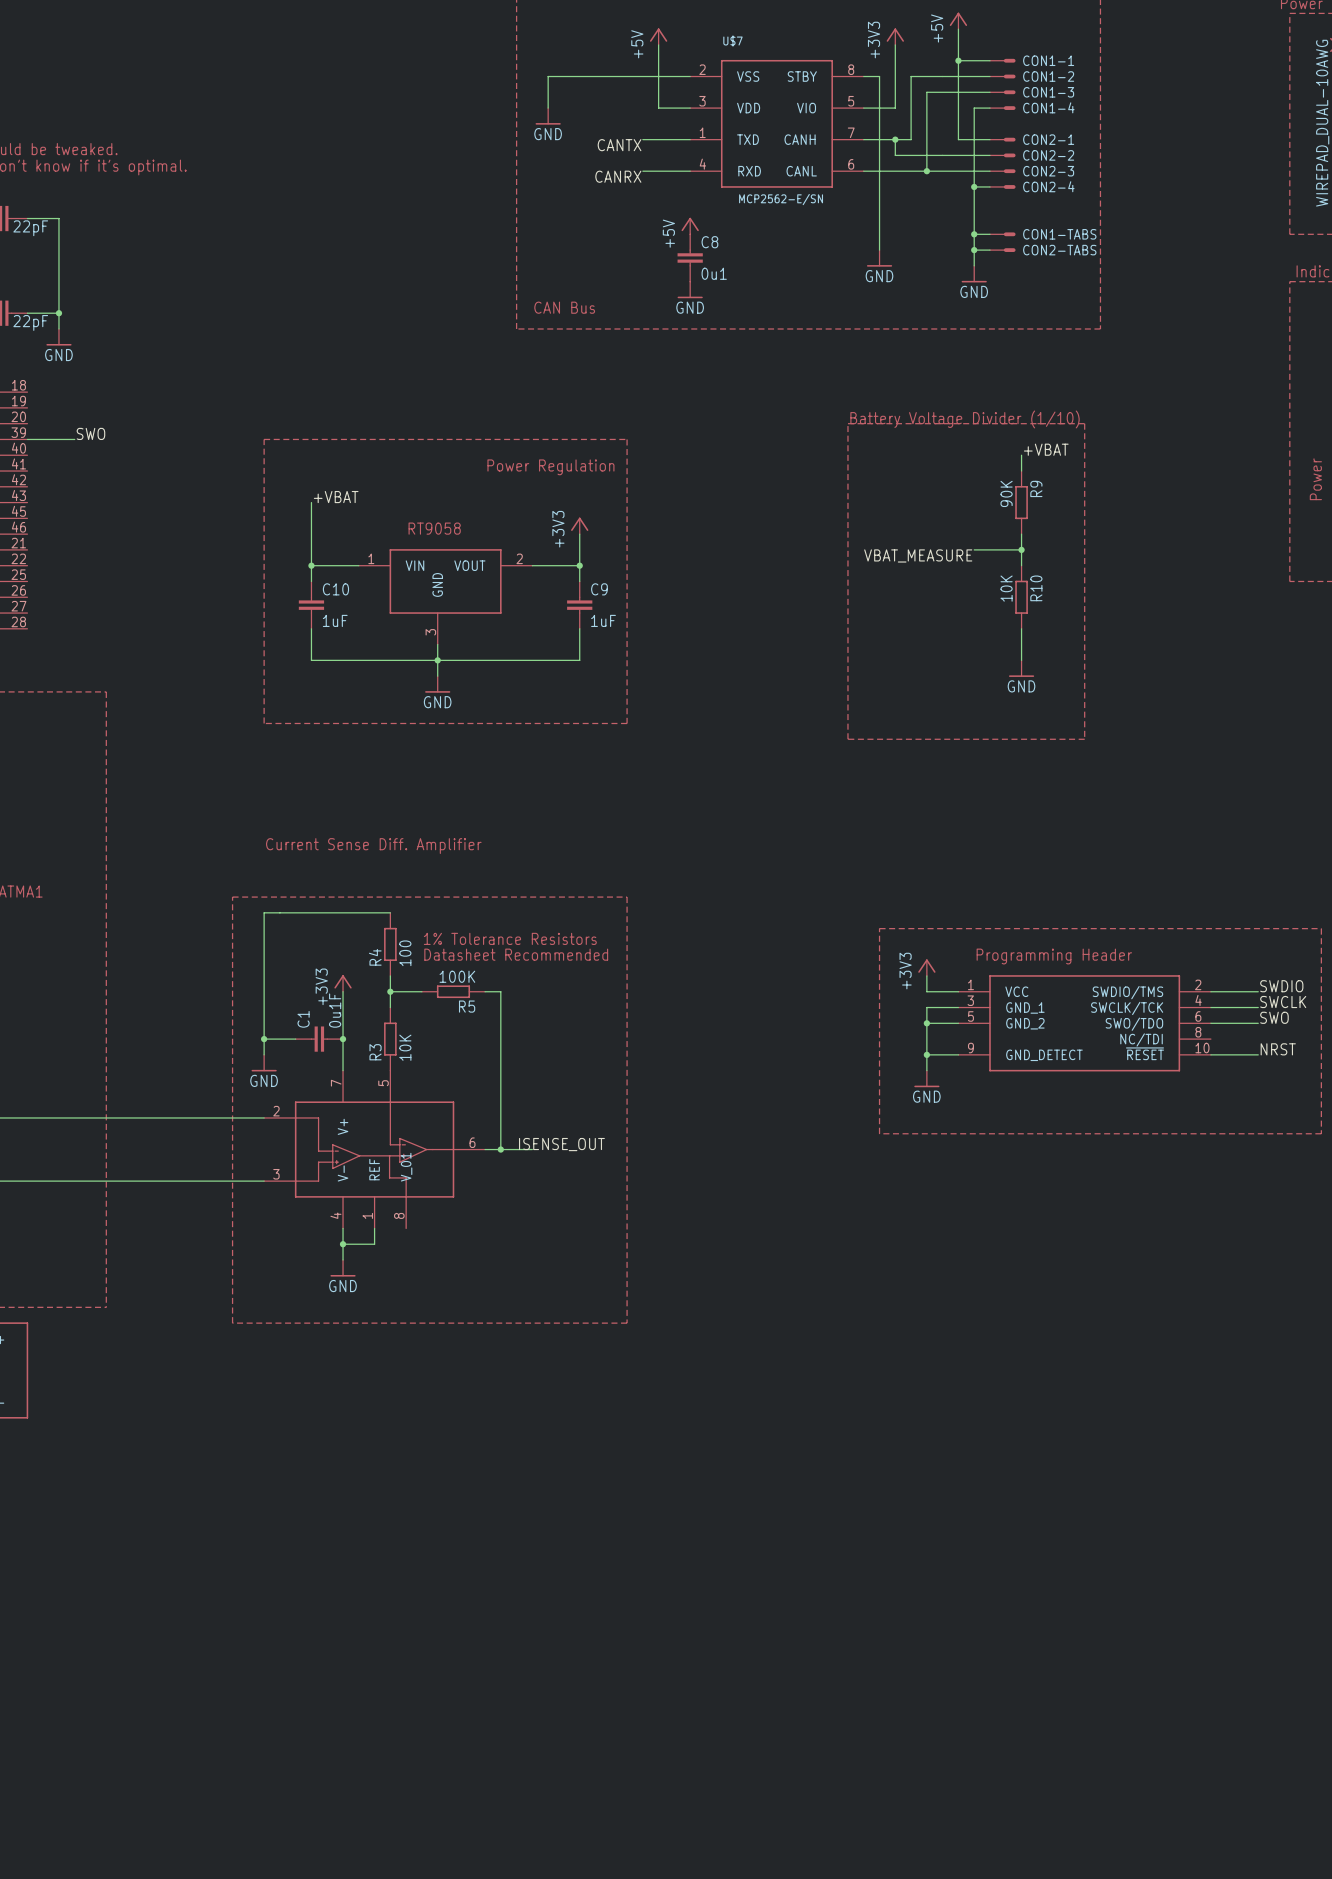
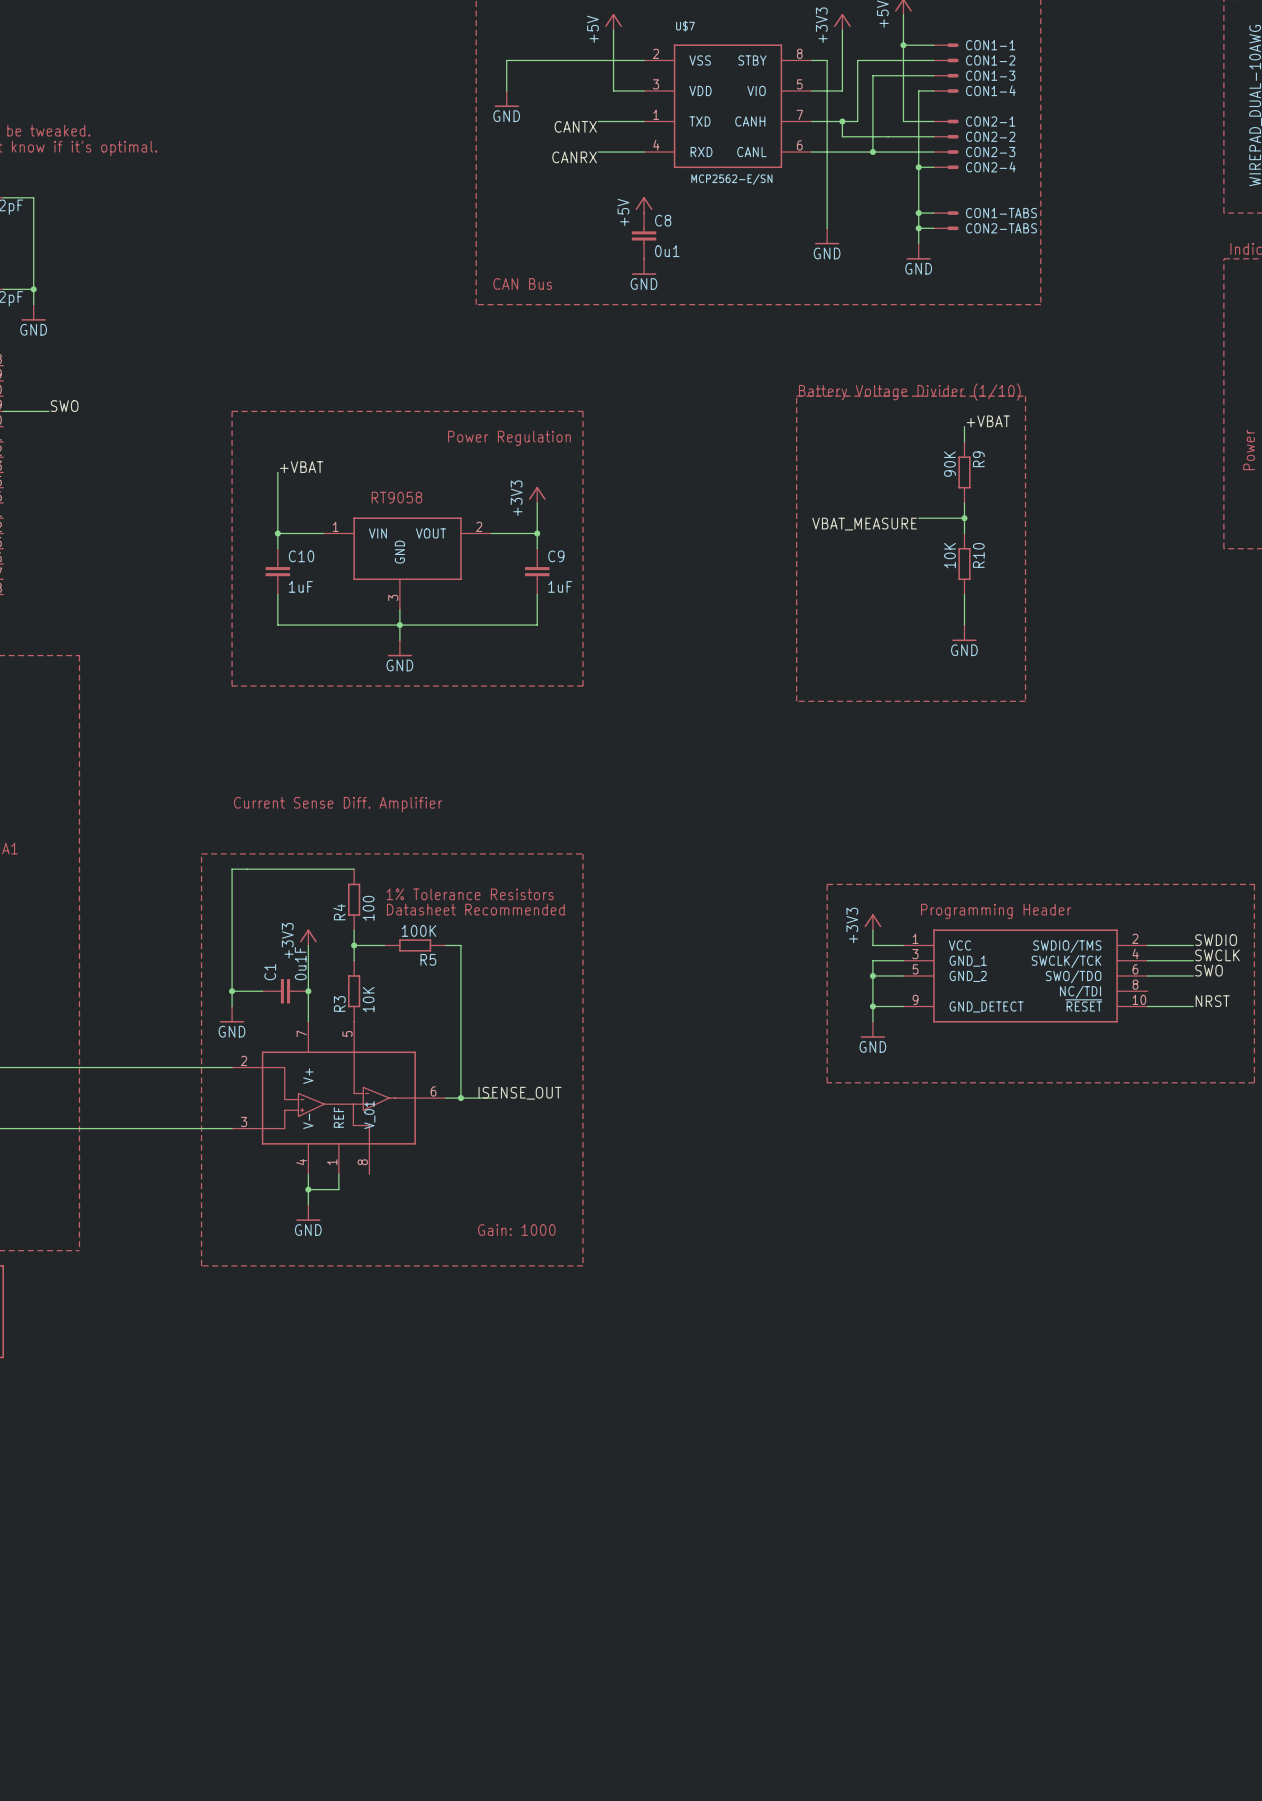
text: none -> Gain: 1000 (516, 1230)

